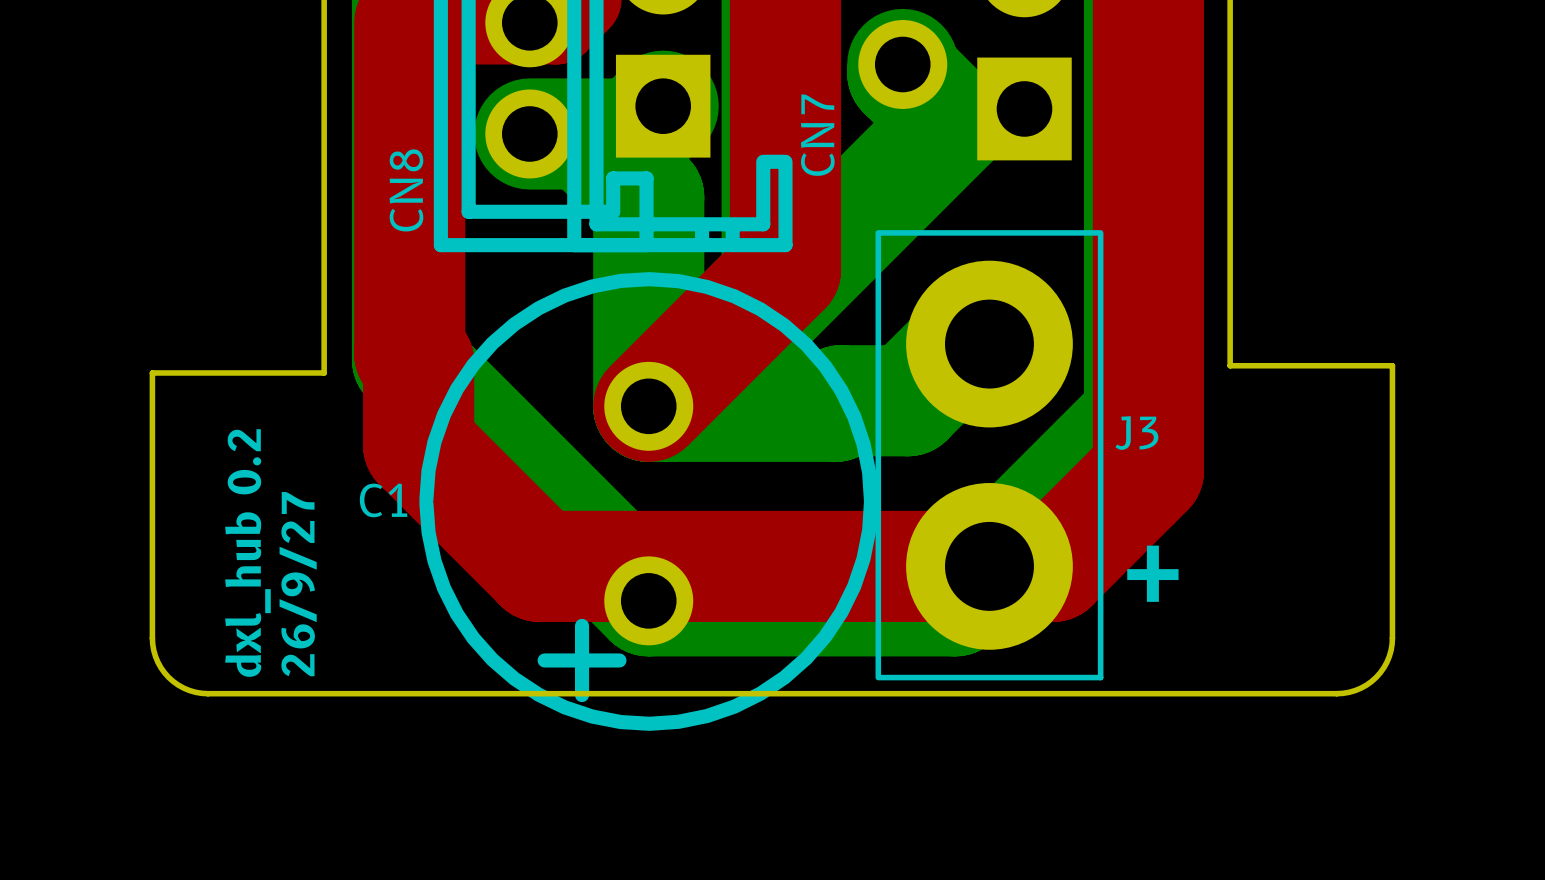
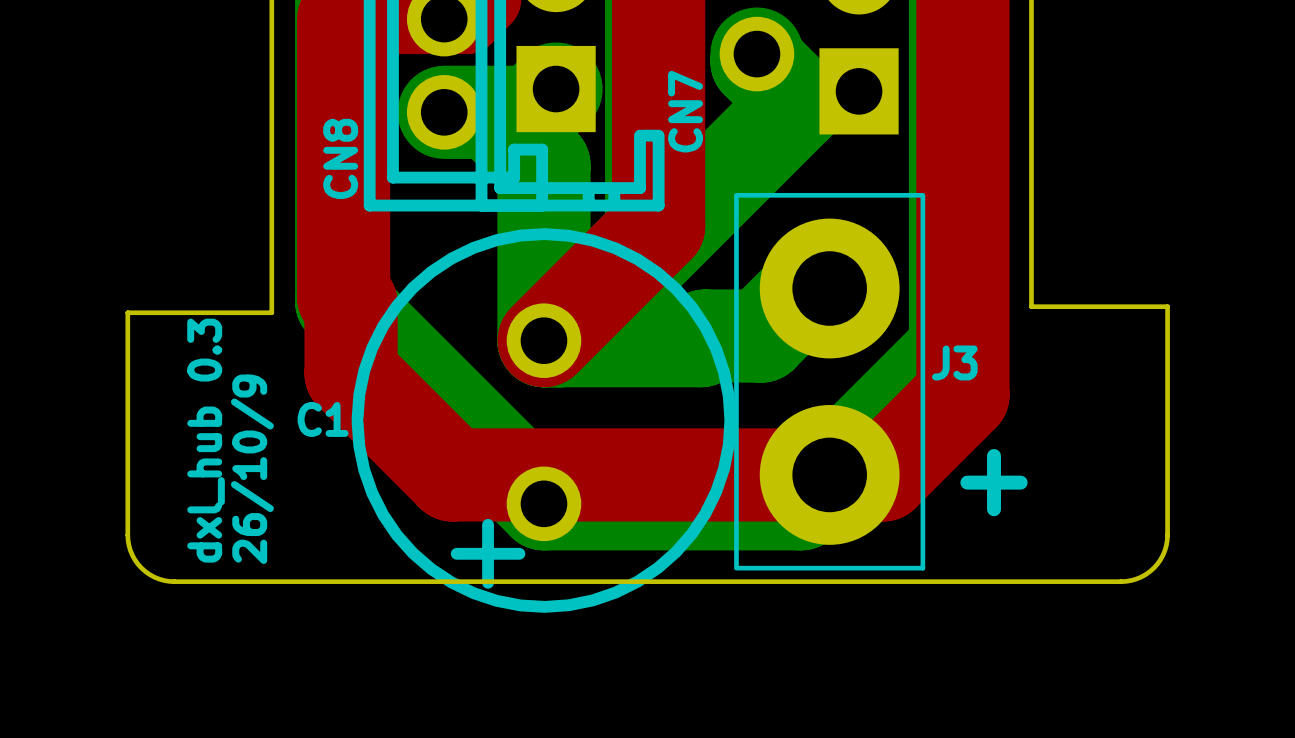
text: dxl_hub 0.2 (247, 553) -> dxl_hub 0.3 (206, 440)
text: 26/9/27 (298, 584) -> 26/10/9 (252, 469)

